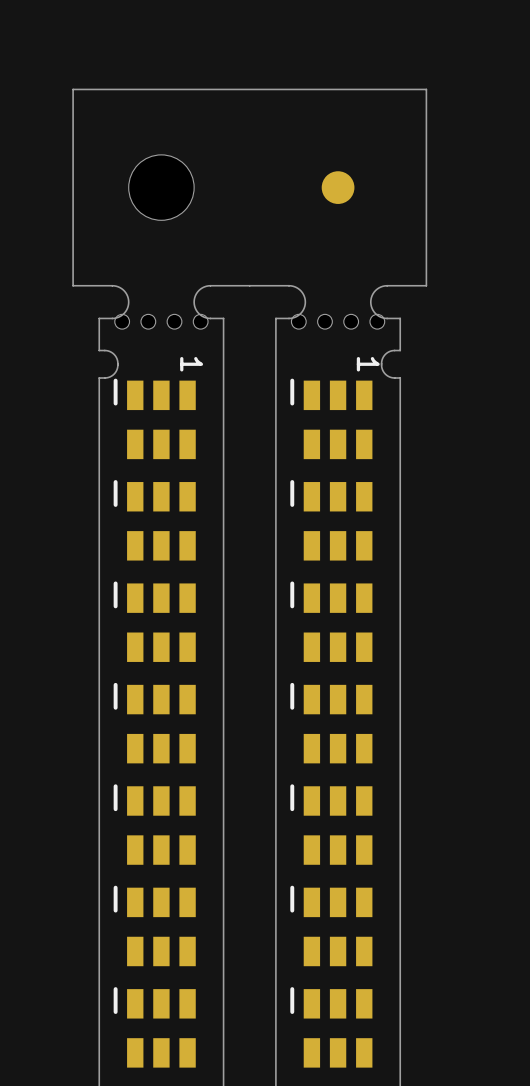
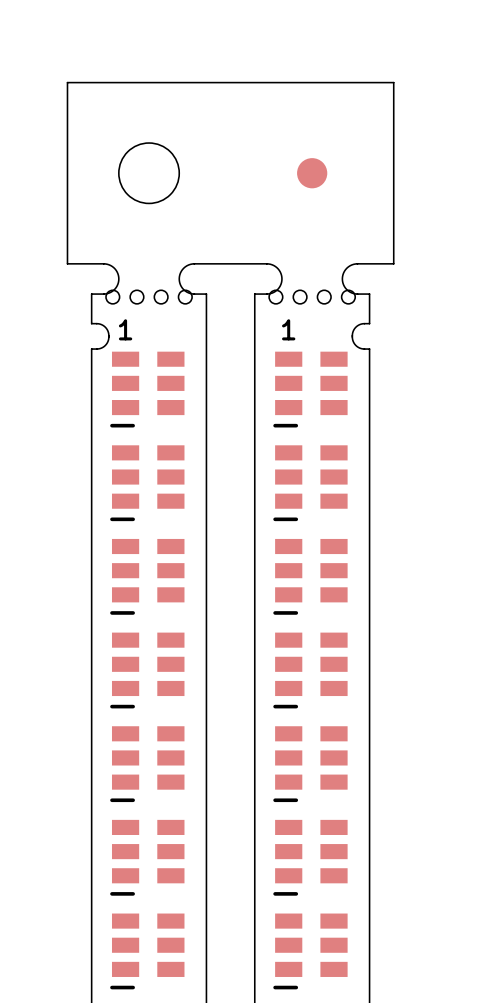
part footprint: [113, 378, 196, 460] -> [110, 351, 185, 428]
part footprint: [290, 378, 373, 460] -> [273, 351, 348, 428]
part rotation: 0° (154, 520) -> 90° counterclockwise (147, 483)
part rotation: 0° (331, 520) -> 90° counterclockwise (310, 483)
part rotation: 0° (154, 621) -> 90° counterclockwise (147, 576)
part rotation: 0° (331, 621) -> 90° counterclockwise (310, 576)
part rotation: 0° (154, 723) -> 90° counterclockwise (147, 670)
part rotation: 0° (331, 723) -> 90° counterclockwise (310, 670)
part rotation: 0° (154, 824) -> 90° counterclockwise (147, 764)
part rotation: 0° (331, 824) -> 90° counterclockwise (310, 764)
part rotation: 0° (154, 925) -> 90° counterclockwise (147, 857)
part rotation: 0° (331, 925) -> 90° counterclockwise (310, 857)
part rotation: 0° (154, 1027) -> 90° counterclockwise (147, 951)
part rotation: 0° (331, 1027) -> 90° counterclockwise (310, 951)

